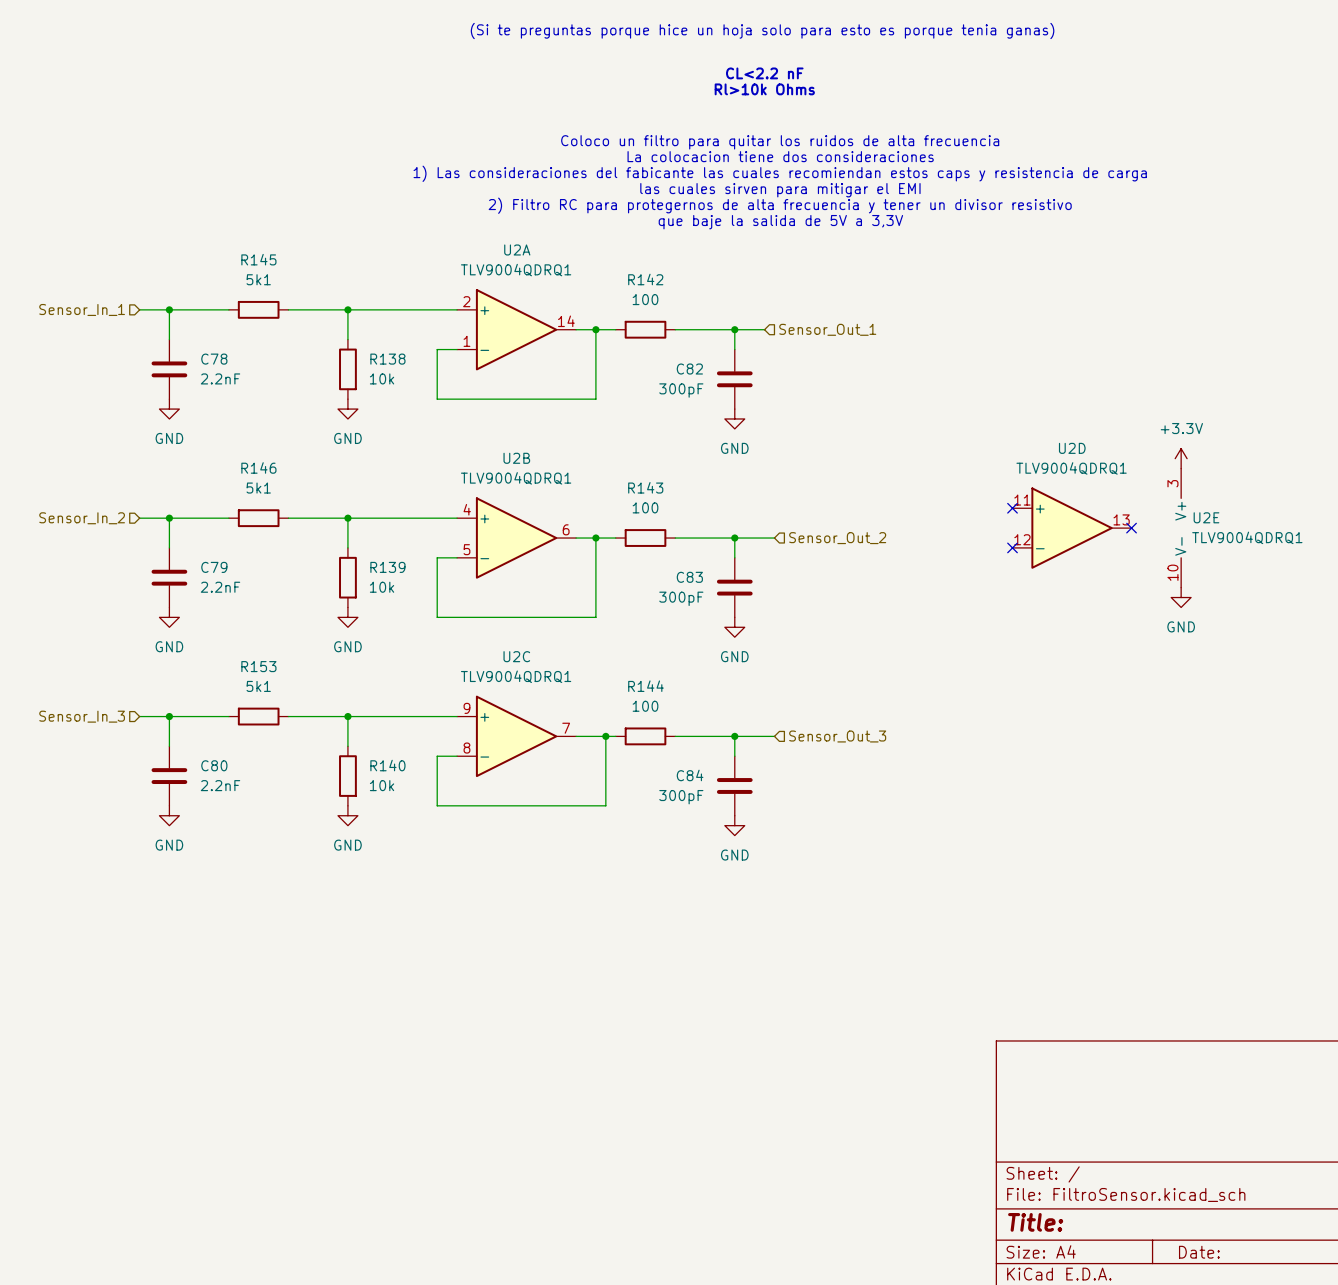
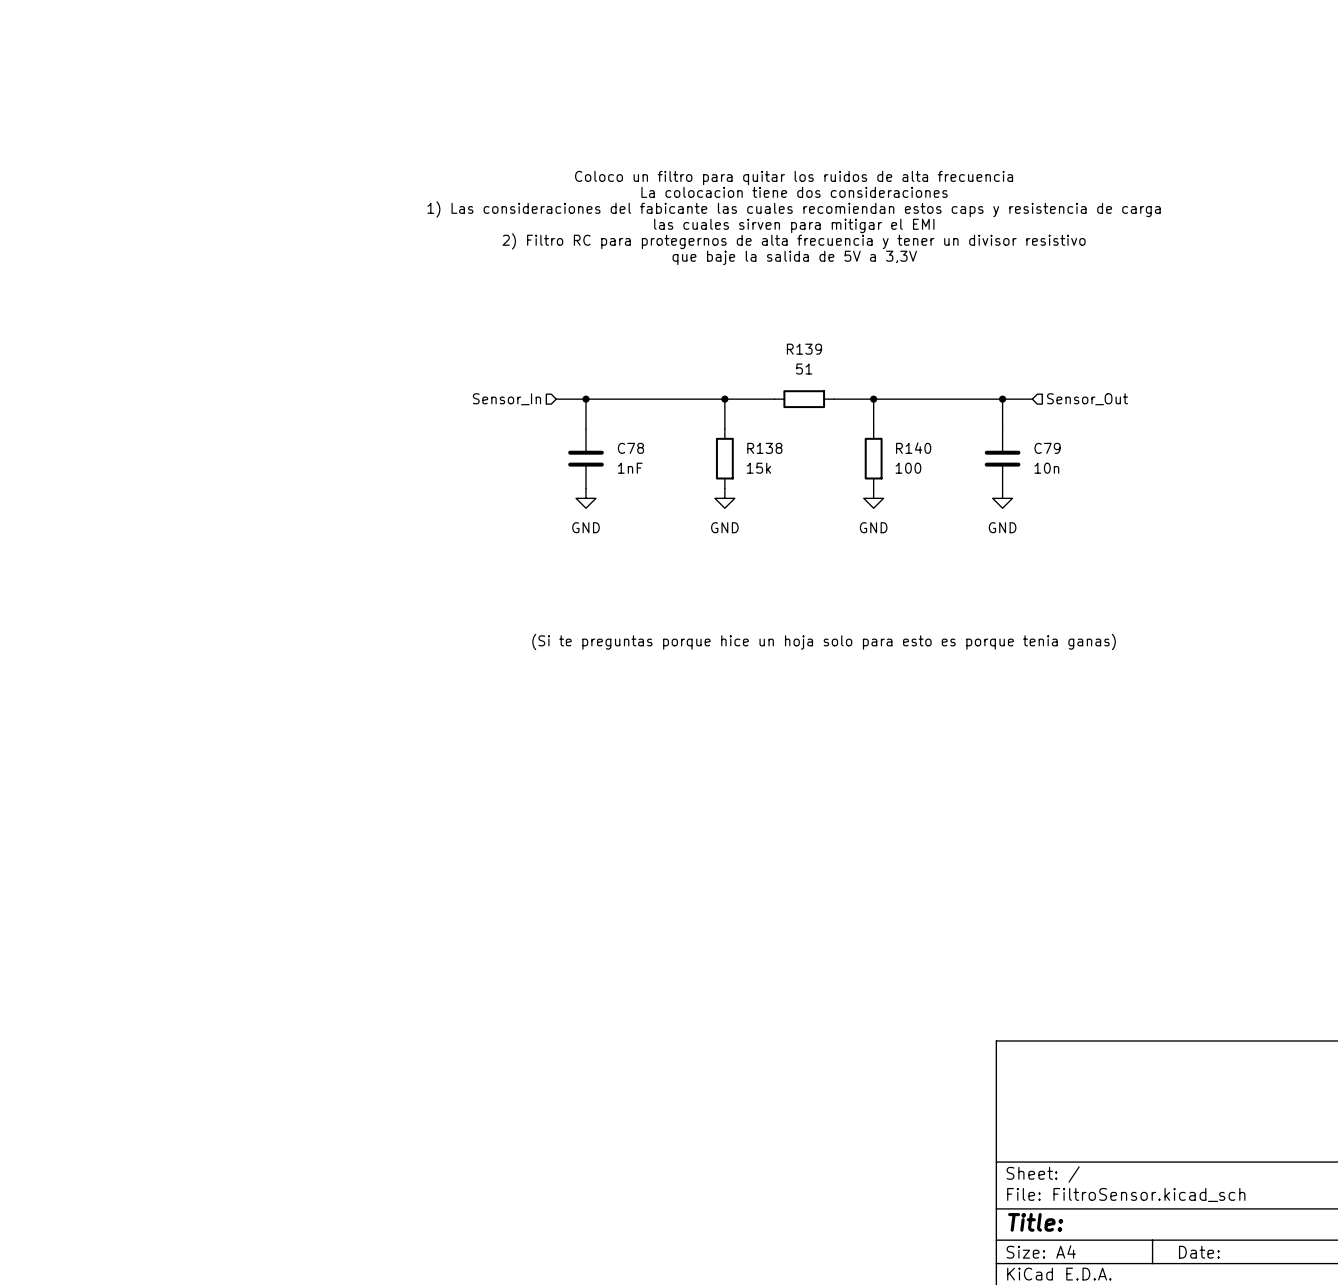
text: (Si te preguntas porque hice un hoja solo para esto es porque tenia ganas) (762, 31) -> none
text: CL<2.2 nF (764, 73) -> none
text: Rl>10k Ohms (764, 89) -> none
text position: Coloco un filtro para quitar los ruidos de alta frecuencia (780, 142) -> Coloco un filtro para quitar los ruidos de alta frecuencia (794, 178)
text position: La colocacion tiene dos consideraciones (780, 156) -> La colocacion tiene dos consideraciones (794, 192)
text position: 1) Las consideraciones del fabicante las cuales recomiendan estos caps y resistencia de carga (780, 173) -> 1) Las consideraciones del fabicante las cuales recomiendan estos caps y resistencia de carga (794, 209)
text position: las cuales sirven para mitigar el EMI (780, 190) -> las cuales sirven para mitigar el EMI (794, 225)
text position: 2) Filtro RC para protegernos de alta frecuencia y tener un divisor resistivo (780, 205) -> 2) Filtro RC para protegernos de alta frecuencia y tener un divisor resistivo (794, 241)
text position: que baje la salida de 5V a 3,3V (780, 222) -> que baje la salida de 5V a 3,3V (794, 257)
hierarchical label: Sensor_In_1 (82, 309) -> none
wire: (139, 309) (228, 309) -> none
wire: (169, 309) (169, 339) -> none
junction: (169, 309) -> none
R145: 5k1 (258, 309) -> none
wire: (288, 309) (457, 309) -> none
wire: (347, 309) (347, 339) -> none
junction: (347, 309) -> none
U2A: TLV9004QDRQ1 (516, 329) -> none
wire: (576, 329) (615, 329) -> none
wire: (595, 329) (595, 399) -> (774, 399) (595, 399)
junction: (595, 329) -> none
R142: 100 (645, 329) -> none
wire: (675, 329) (764, 329) -> none
wire: (734, 329) (734, 349) -> none
junction: (734, 329) -> none
hierarchical label: Sensor_Out_1 (827, 329) -> none
wire: (457, 349) (437, 349) (437, 399) (556, 399) -> none
C78 position: (169, 369) -> (586, 458)
R138 position: (347, 369) -> (724, 458)
C78 value: 2.2nF (220, 378) -> 1nF (630, 468)
R138 value: 10k (382, 378) -> 15k (758, 468)
C82: 300pF (734, 379) -> none
hierarchical label: none -> Sensor_In (506, 399)
wire: none -> (586, 399) (586, 428)
junction: none -> (586, 399)
wire: none -> (724, 399) (724, 428)
junction: none -> (724, 399)
wire: none -> (833, 399) (1032, 399)
wire: none -> (873, 399) (873, 428)
junction: none -> (873, 399)
wire: none -> (1002, 399) (1002, 428)
junction: none -> (1002, 399)
hierarchical label: none -> Sensor_Out (1087, 399)
power symbol: GND (169, 409) -> none
power symbol: GND (347, 409) -> none
power symbol: GND (734, 418) -> none
power symbol: +3.3V (1181, 458) -> none
power symbol: none -> GND (586, 498)
power symbol: none -> GND (724, 498)
power symbol: none -> GND (873, 498)
power symbol: none -> GND (1002, 498)
no-connect mark: (1012, 508) -> none
hierarchical label: Sensor_In_2 (82, 518) -> none
wire: (139, 518) (228, 518) -> none
wire: (169, 518) (169, 547) -> none
junction: (169, 518) -> none
R146: 5k1 (258, 518) -> none
wire: (288, 518) (457, 518) -> none
wire: (347, 518) (347, 547) -> none
junction: (347, 518) -> none
U2D: TLV9004QDRQ1 (1072, 528) -> none
no-connect mark: (1131, 528) -> none
U2E: TLV9004QDRQ1 (1181, 528) -> none
U2B: TLV9004QDRQ1 (516, 538) -> none
wire: (576, 538) (615, 538) -> none
wire: (595, 538) (595, 617) (437, 617) (437, 557) (457, 557) -> none
junction: (595, 538) -> none
R143: 100 (645, 538) -> none
wire: (675, 538) (774, 538) -> none
wire: (734, 538) (734, 557) -> none
junction: (734, 538) -> none
hierarchical label: Sensor_Out_2 (837, 538) -> none
no-connect mark: (1012, 547) -> none
R139 name position: R139 (387, 567) -> R139 (804, 349)
C79 position: (169, 577) -> (1002, 458)
R139 rotation: 0° (347, 577) -> 90° clockwise (804, 399)
R139 position: (347, 577) -> (804, 399)
C79 value: 2.2nF (220, 587) -> 10n (1046, 468)
R139 value: 10k (382, 587) -> 51 (804, 369)
C83: 300pF (734, 587) -> none
power symbol: GND (1181, 597) -> none
power symbol: GND (169, 617) -> none
power symbol: GND (347, 617) -> none
power symbol: GND (734, 627) -> none
text: none -> (Si te preguntas porque hice un hoja solo para esto es porque tenia ganas) (824, 642)
hierarchical label: Sensor_In_3 (82, 716) -> none
wire: (139, 716) (228, 716) -> none
wire: (169, 716) (169, 746) -> none
junction: (169, 716) -> none
R153: 5k1 (258, 716) -> none
wire: (288, 716) (457, 716) -> none
wire: (347, 716) (347, 746) -> none
junction: (347, 716) -> none
U2C: TLV9004QDRQ1 (516, 736) -> none
wire: (576, 736) (615, 736) -> none
wire: (605, 736) (605, 805) (437, 805) (437, 756) (457, 756) -> none
junction: (605, 736) -> none
R144: 100 (645, 736) -> none
wire: (675, 736) (774, 736) -> none
wire: (734, 736) (734, 756) -> none
junction: (734, 736) -> none
hierarchical label: Sensor_Out_3 (837, 736) -> none
C80: 2.2nF (169, 776) -> none
R140 position: (347, 776) -> (873, 458)
R140 value: 10k (382, 785) -> 100 (908, 468)
C84: 300pF (734, 785) -> none
power symbol: GND (169, 815) -> none
power symbol: GND (347, 815) -> none
power symbol: GND (734, 825) -> none

